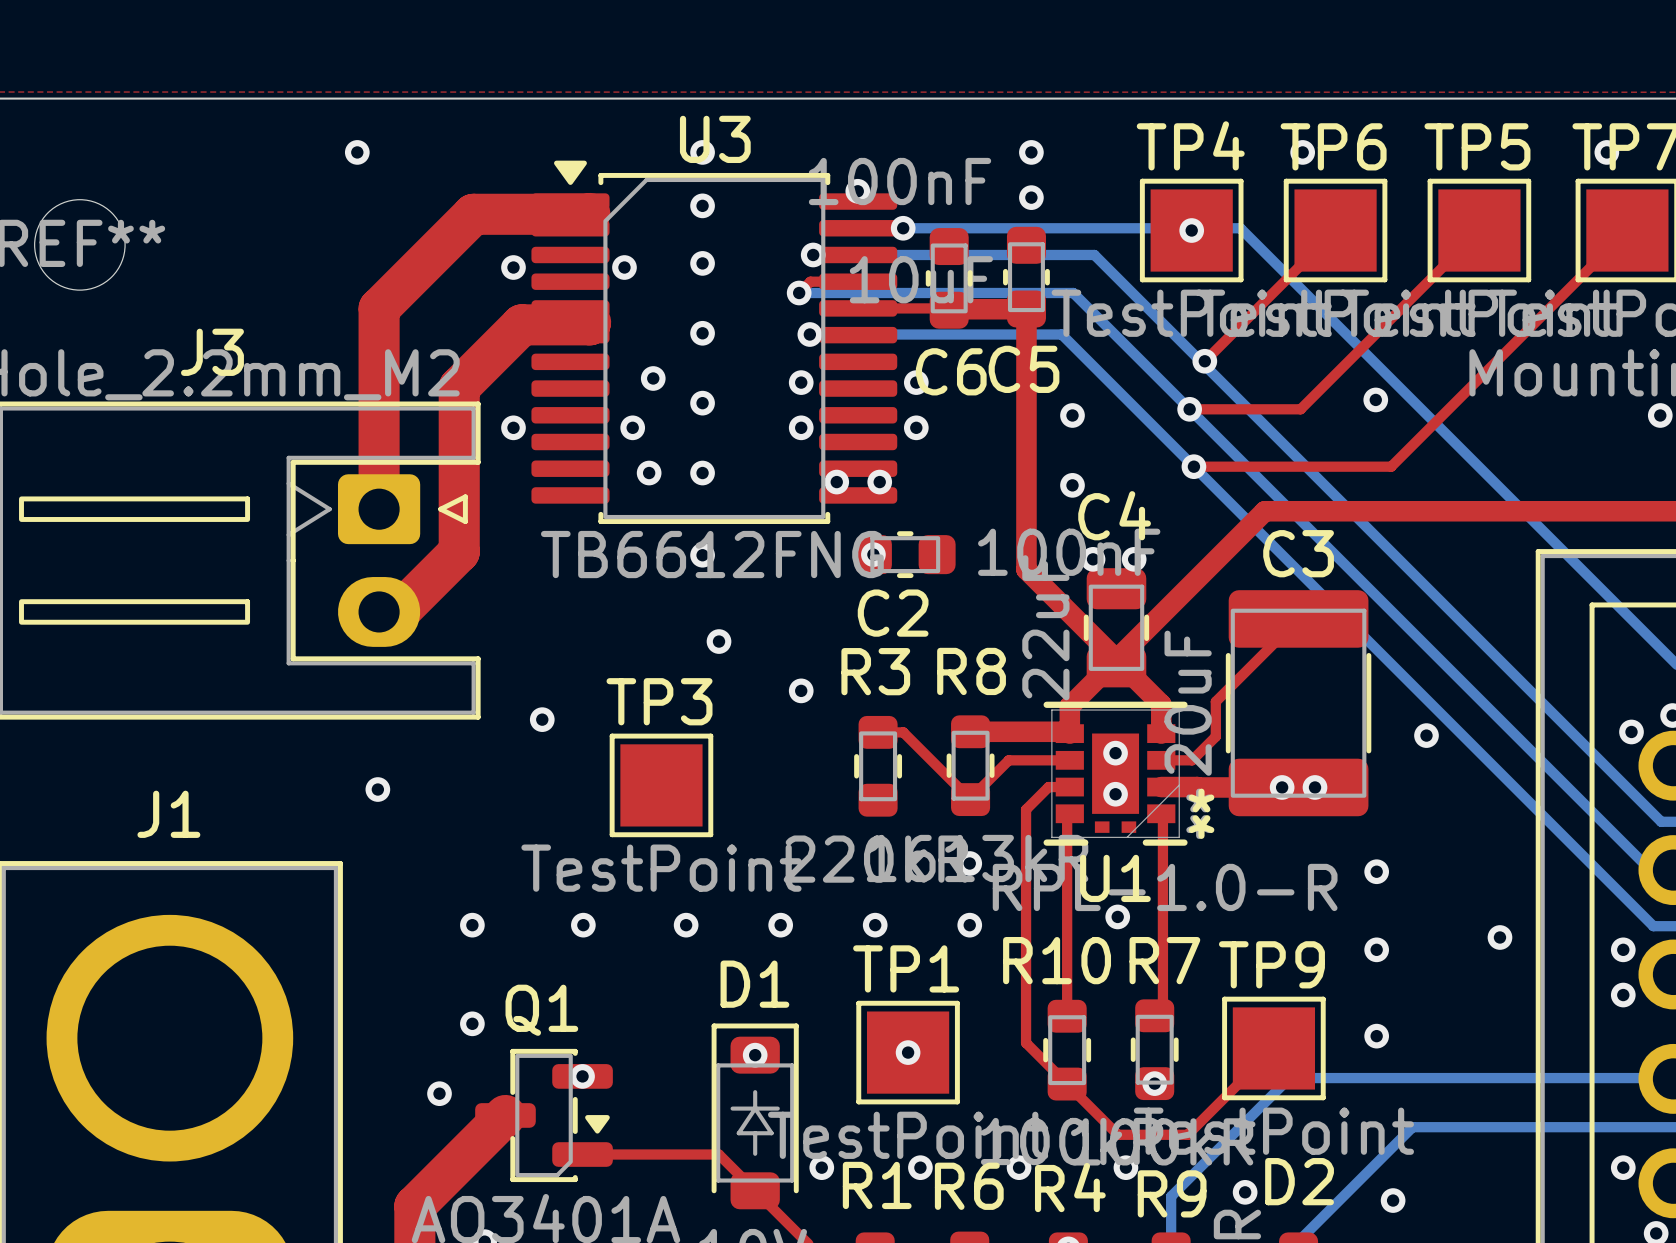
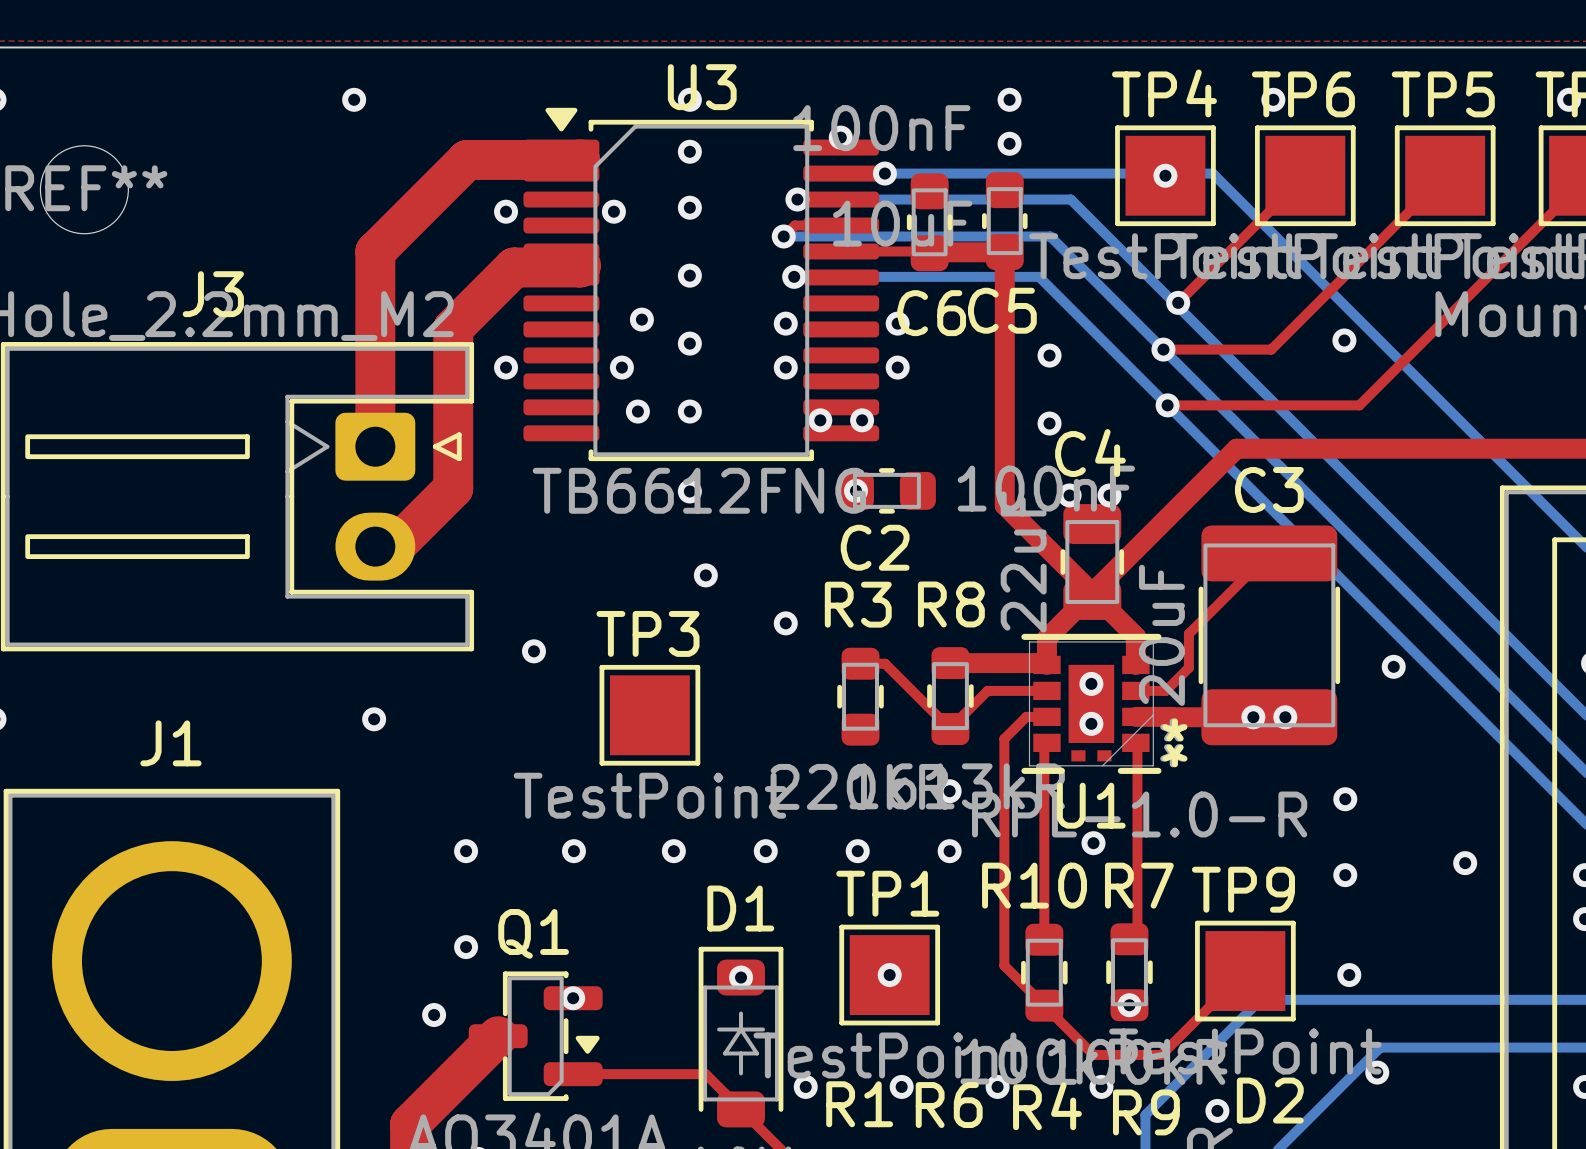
via position: (1376, 1036) -> (1349, 975)
via position: (1393, 1200) -> (1377, 1072)

